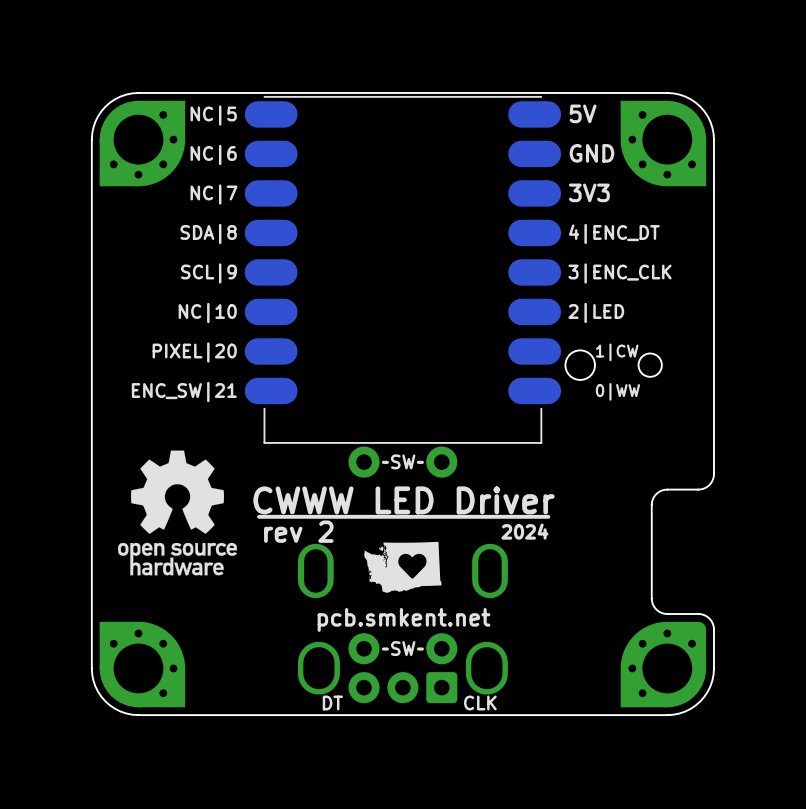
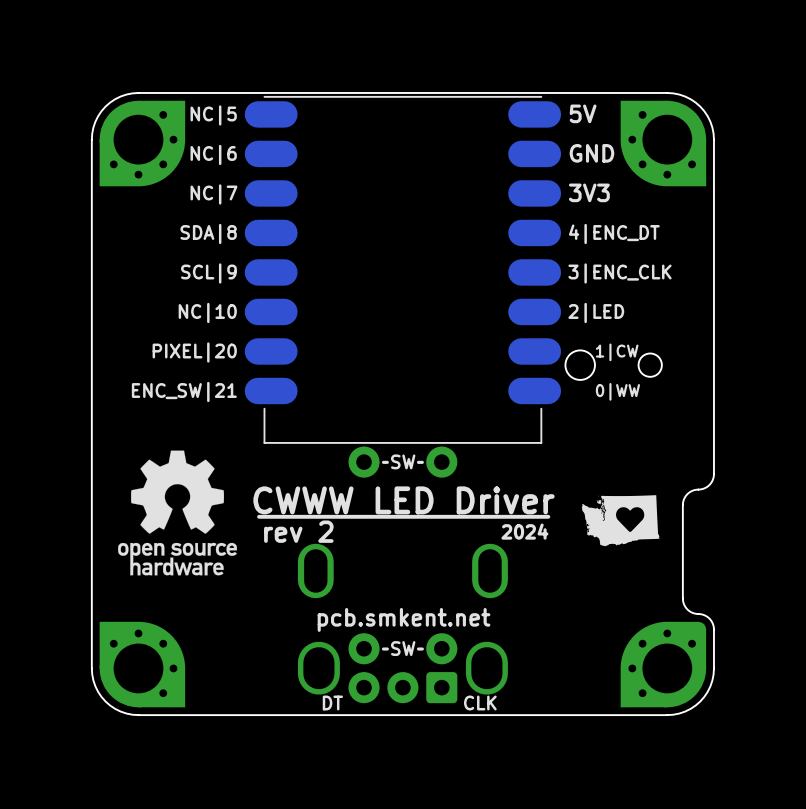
board edge: (698, 489) (662, 490) (654, 496) (651, 505) (653, 605) (657, 610) (663, 613) (698, 614) -> (698, 489) (687, 494) (682, 505) (682, 600) (687, 609) (698, 614)
drawing position: (402, 567) -> (620, 520)

